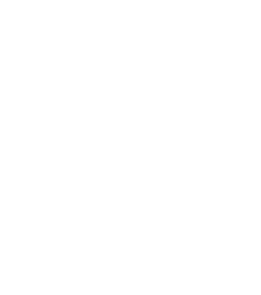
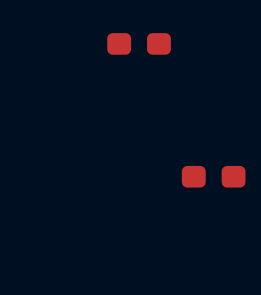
part: none -> (139, 43)
part: none -> (213, 176)

